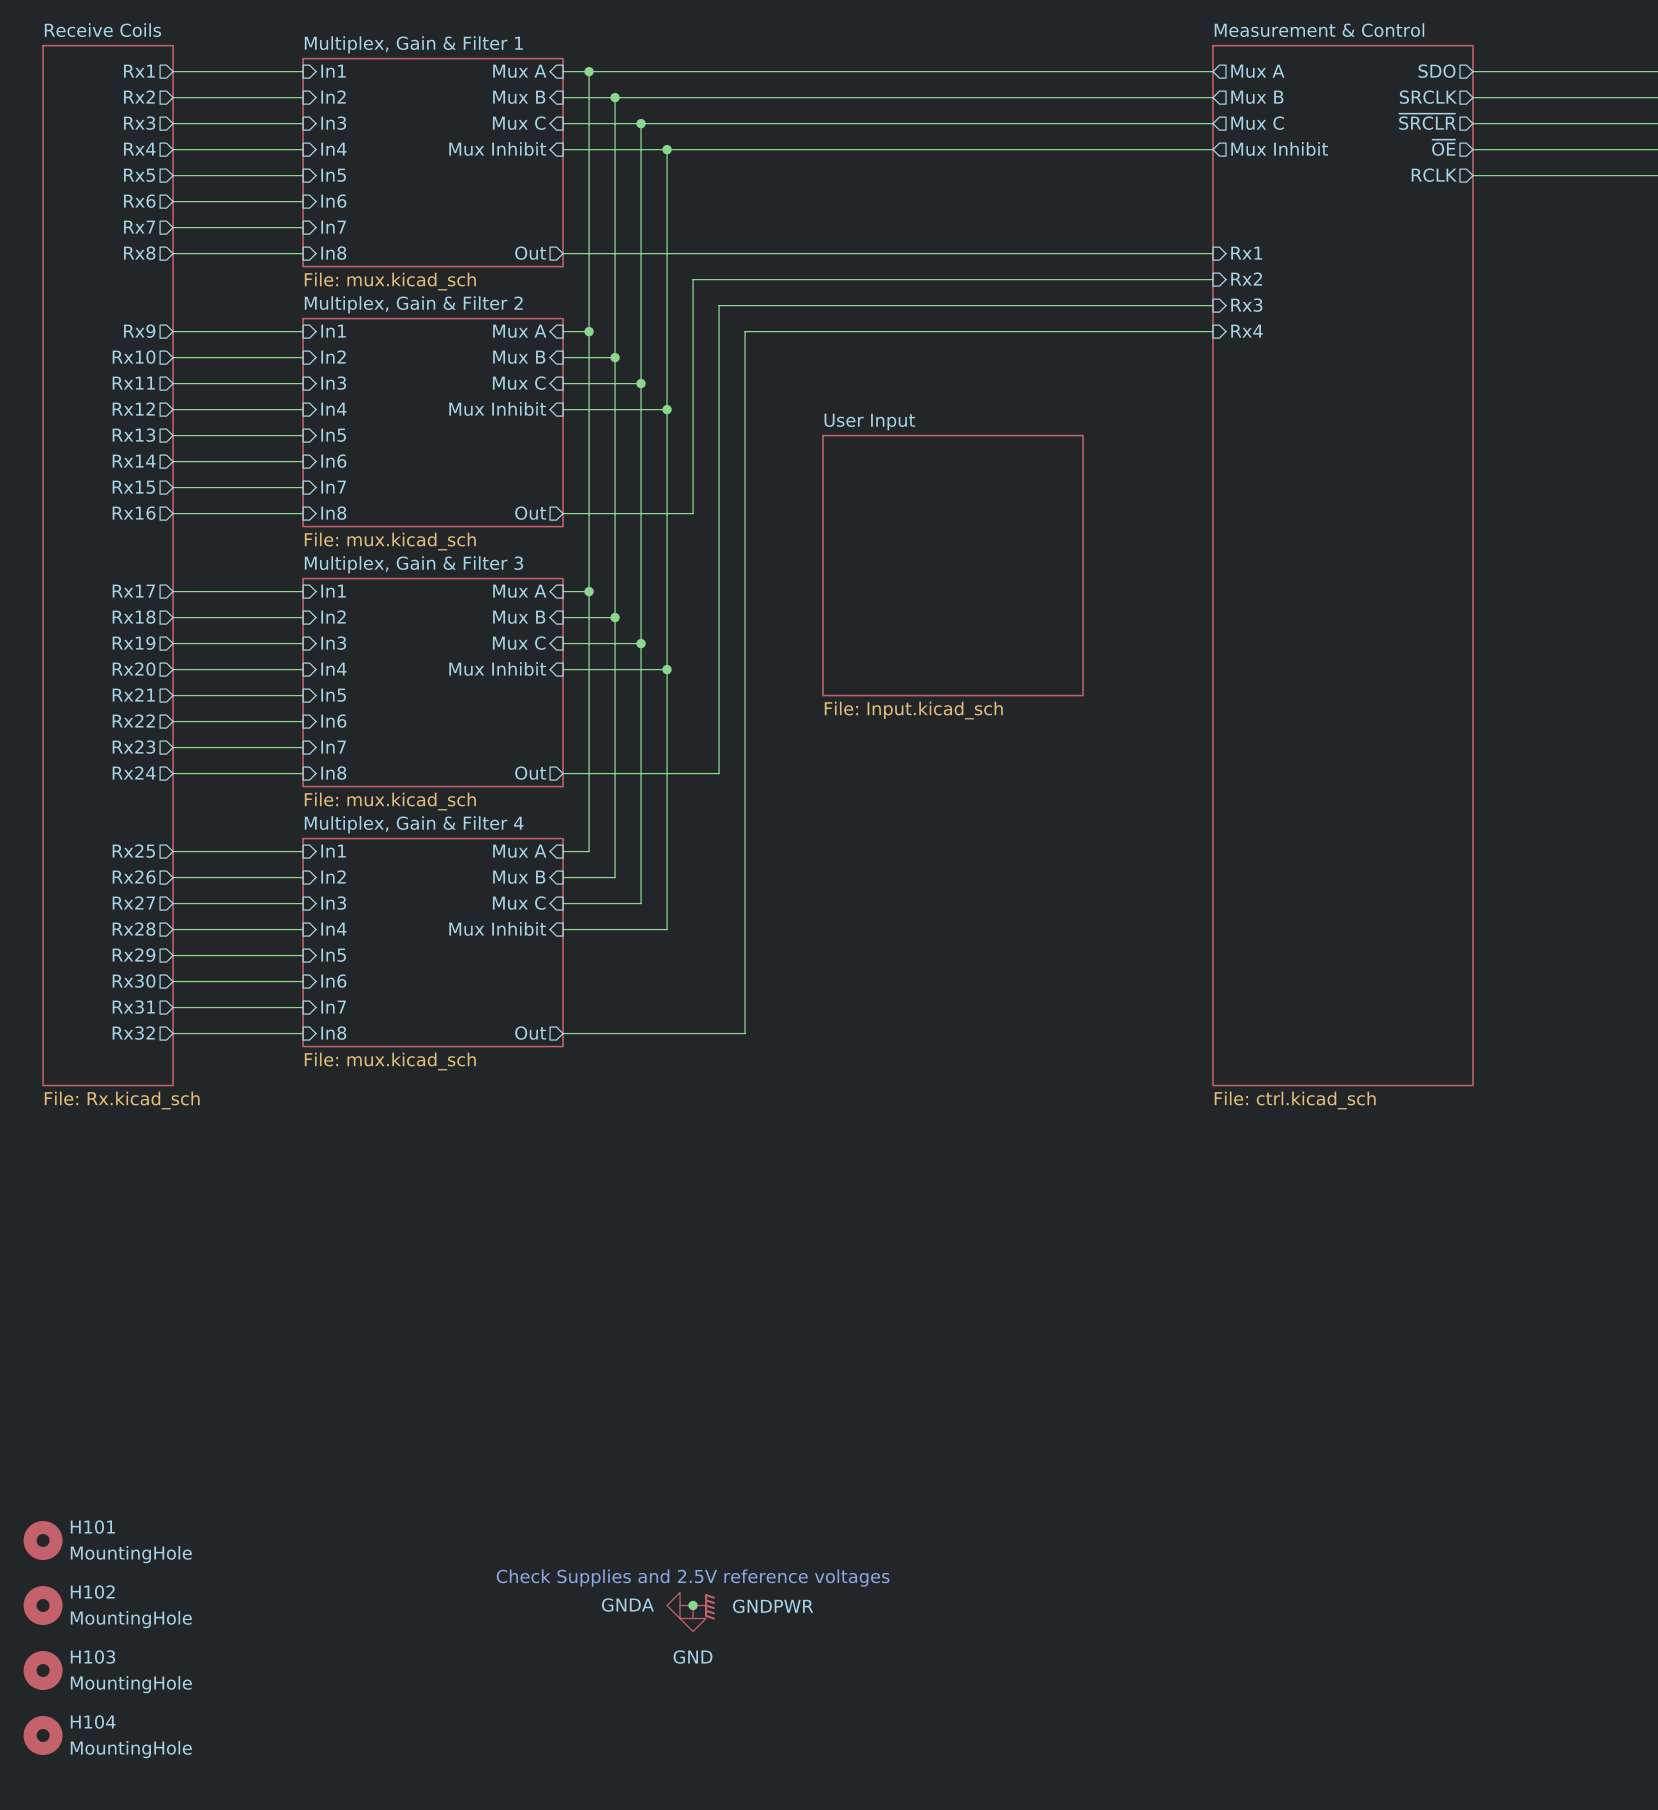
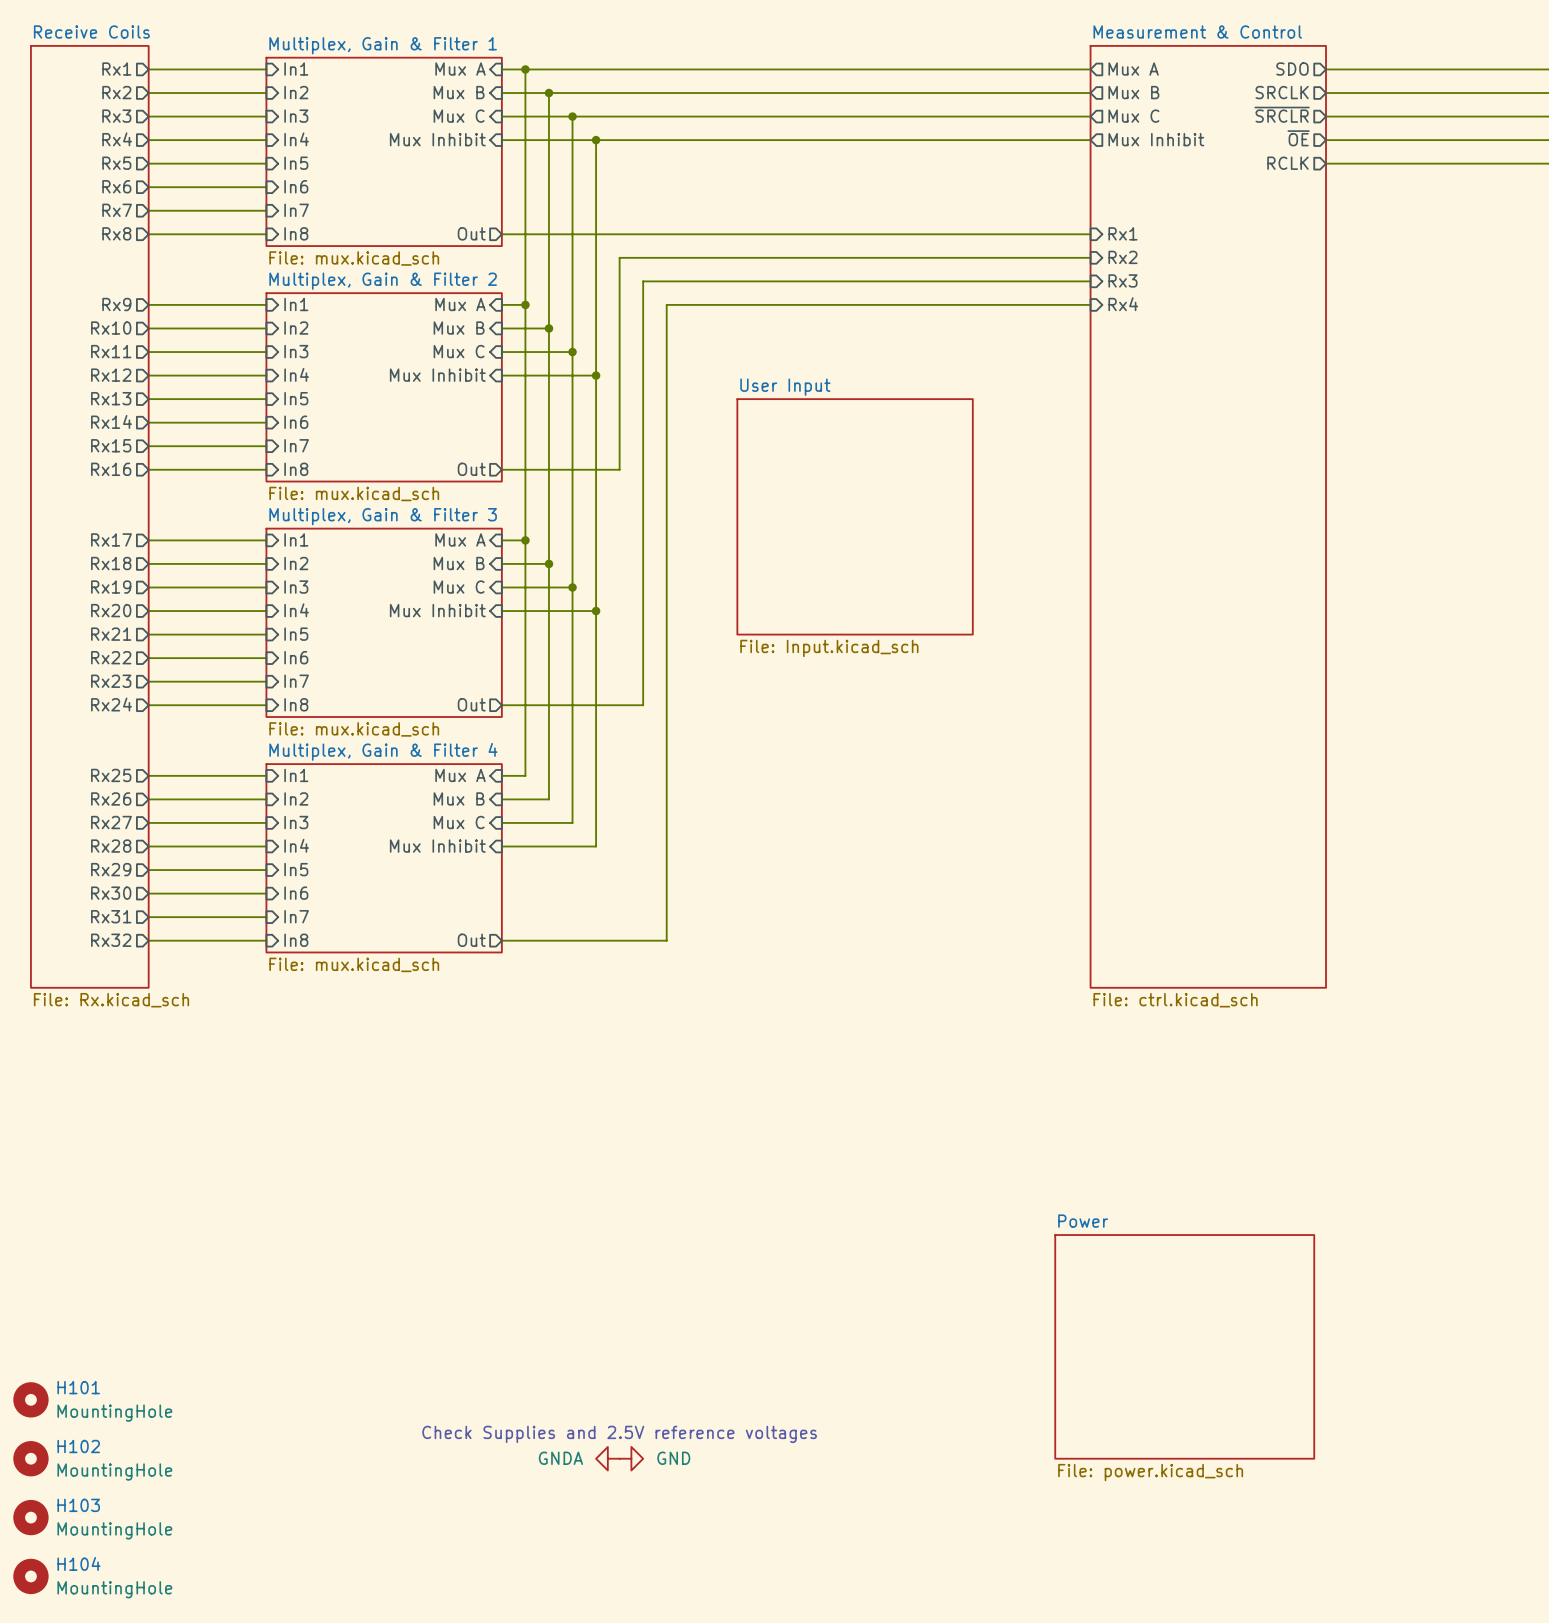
sheet Power: none -> File: power.kicad_sch (1184, 1346)
junction: (693, 1605) -> none
power symbol: GNDPWR (703, 1606) -> GND (631, 1458)
power symbol: GND (693, 1618) -> none

